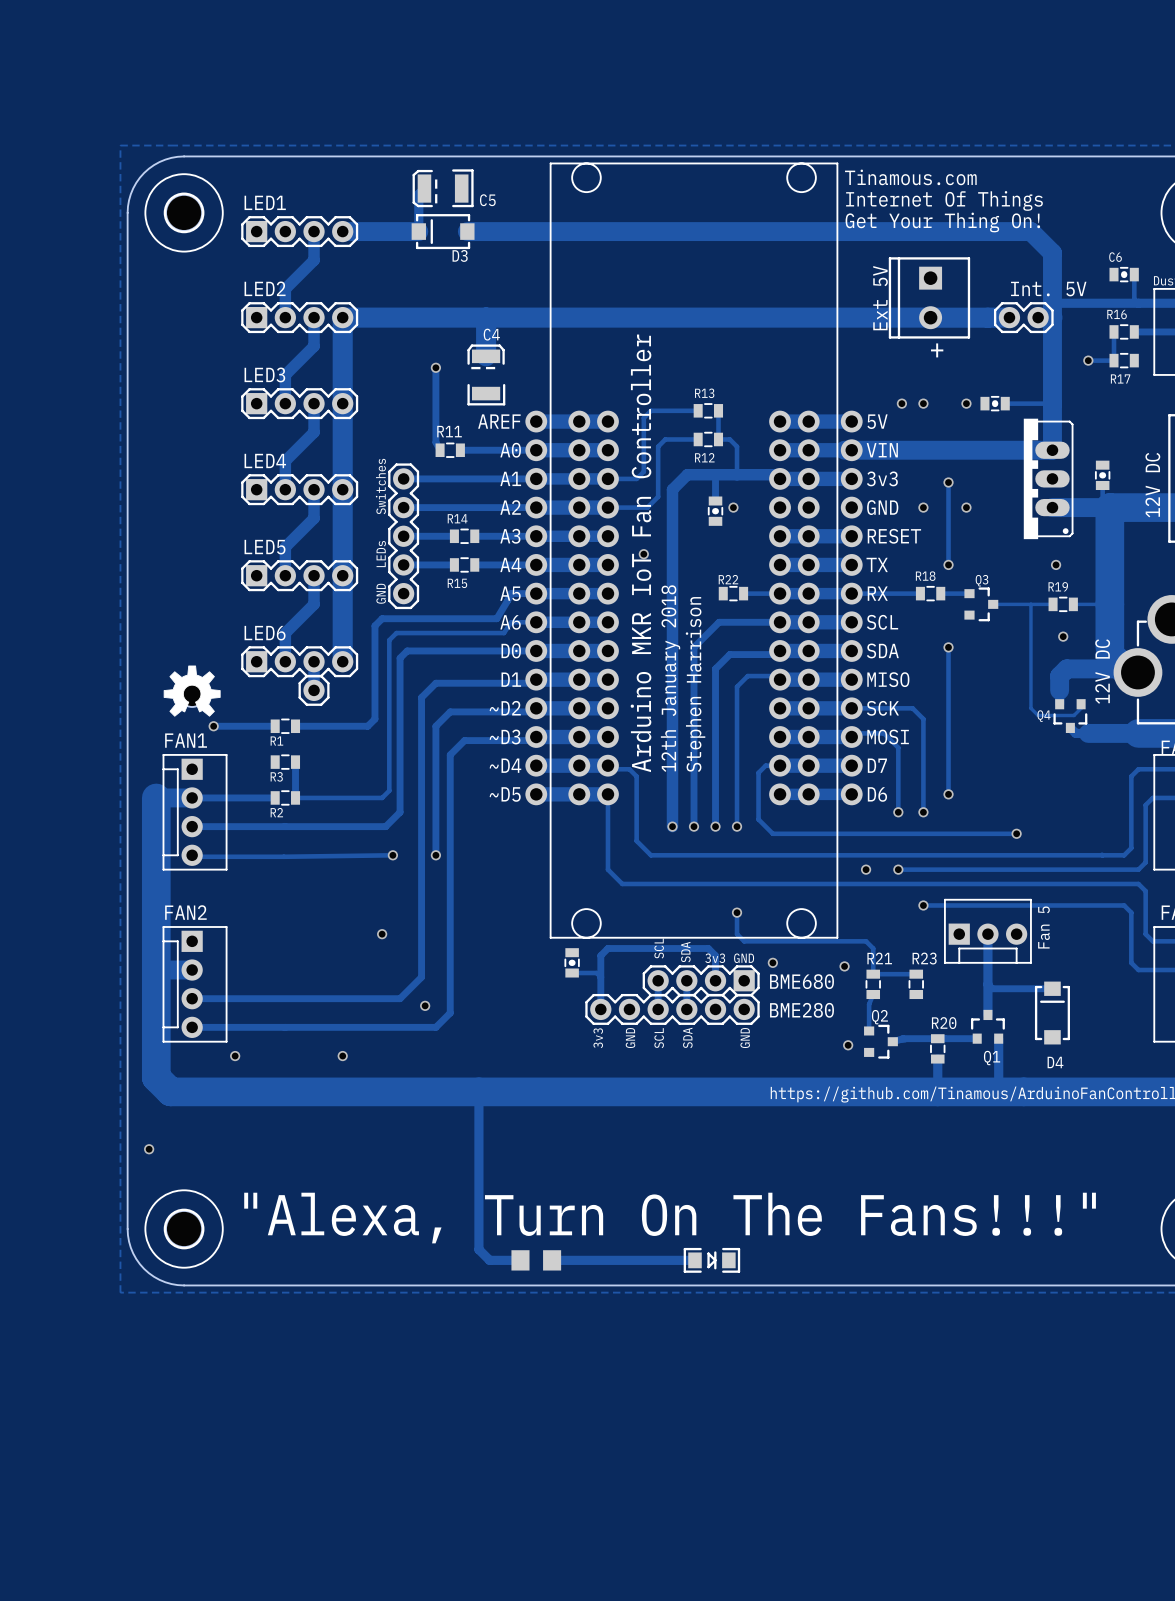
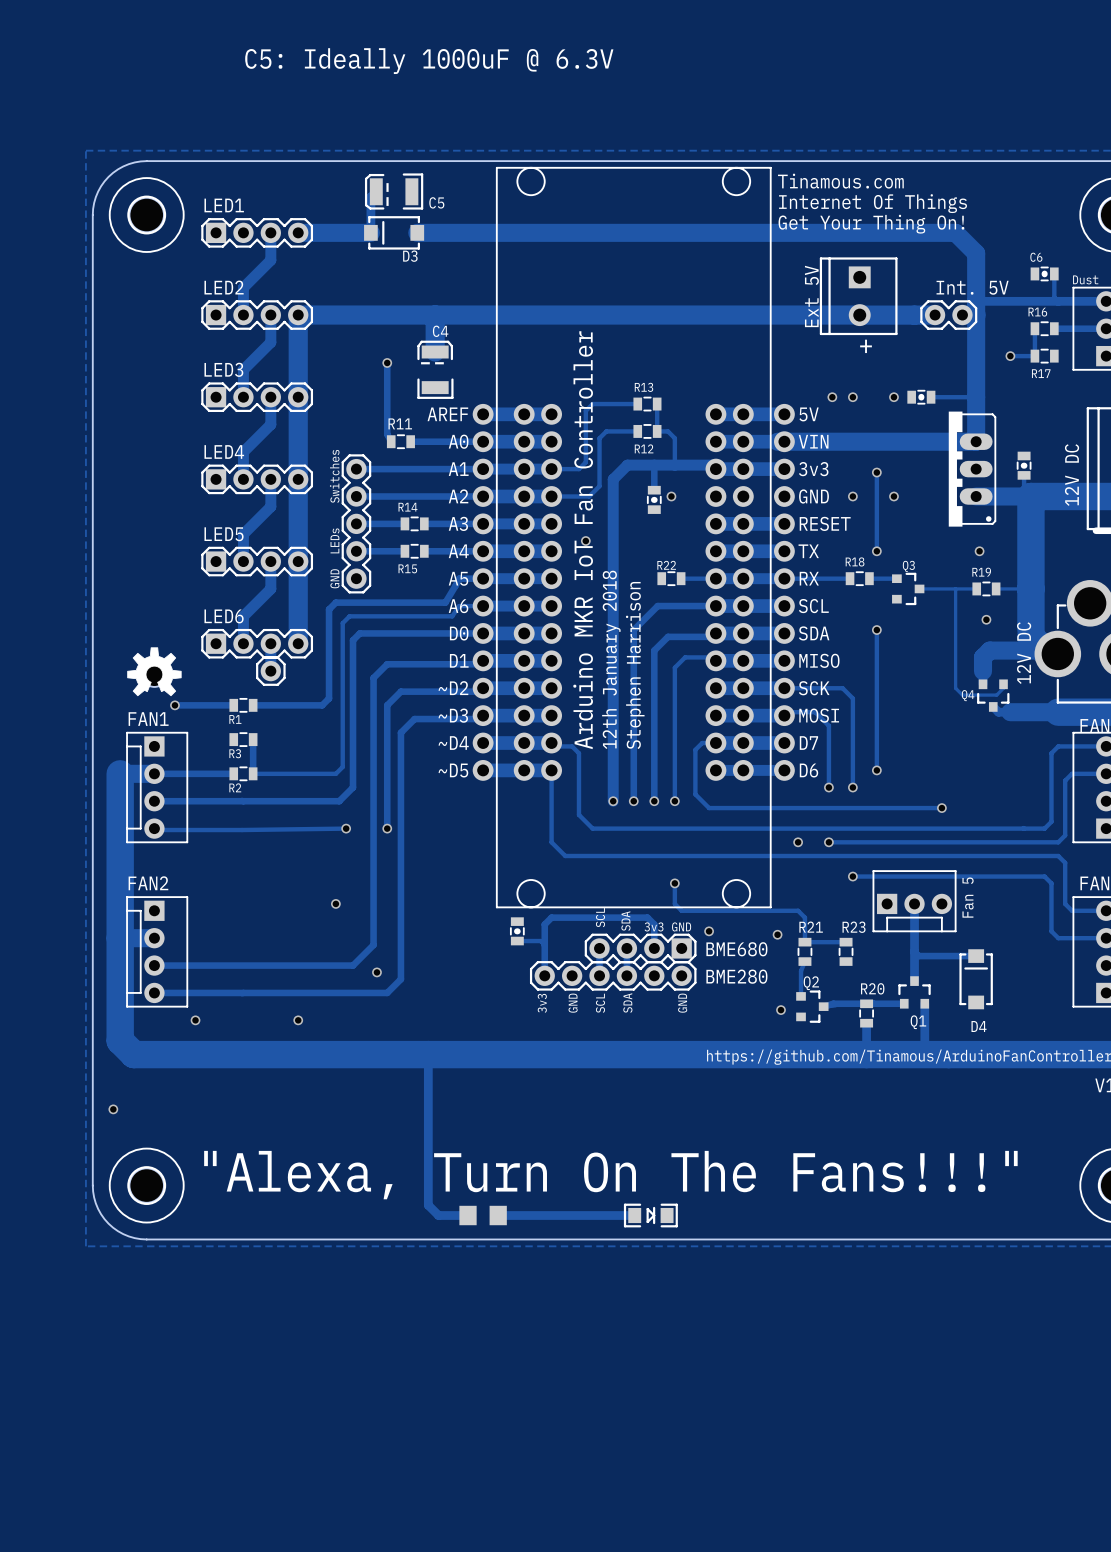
text: none -> C5: Ideally 1000uF @ 6.3V (429, 61)

